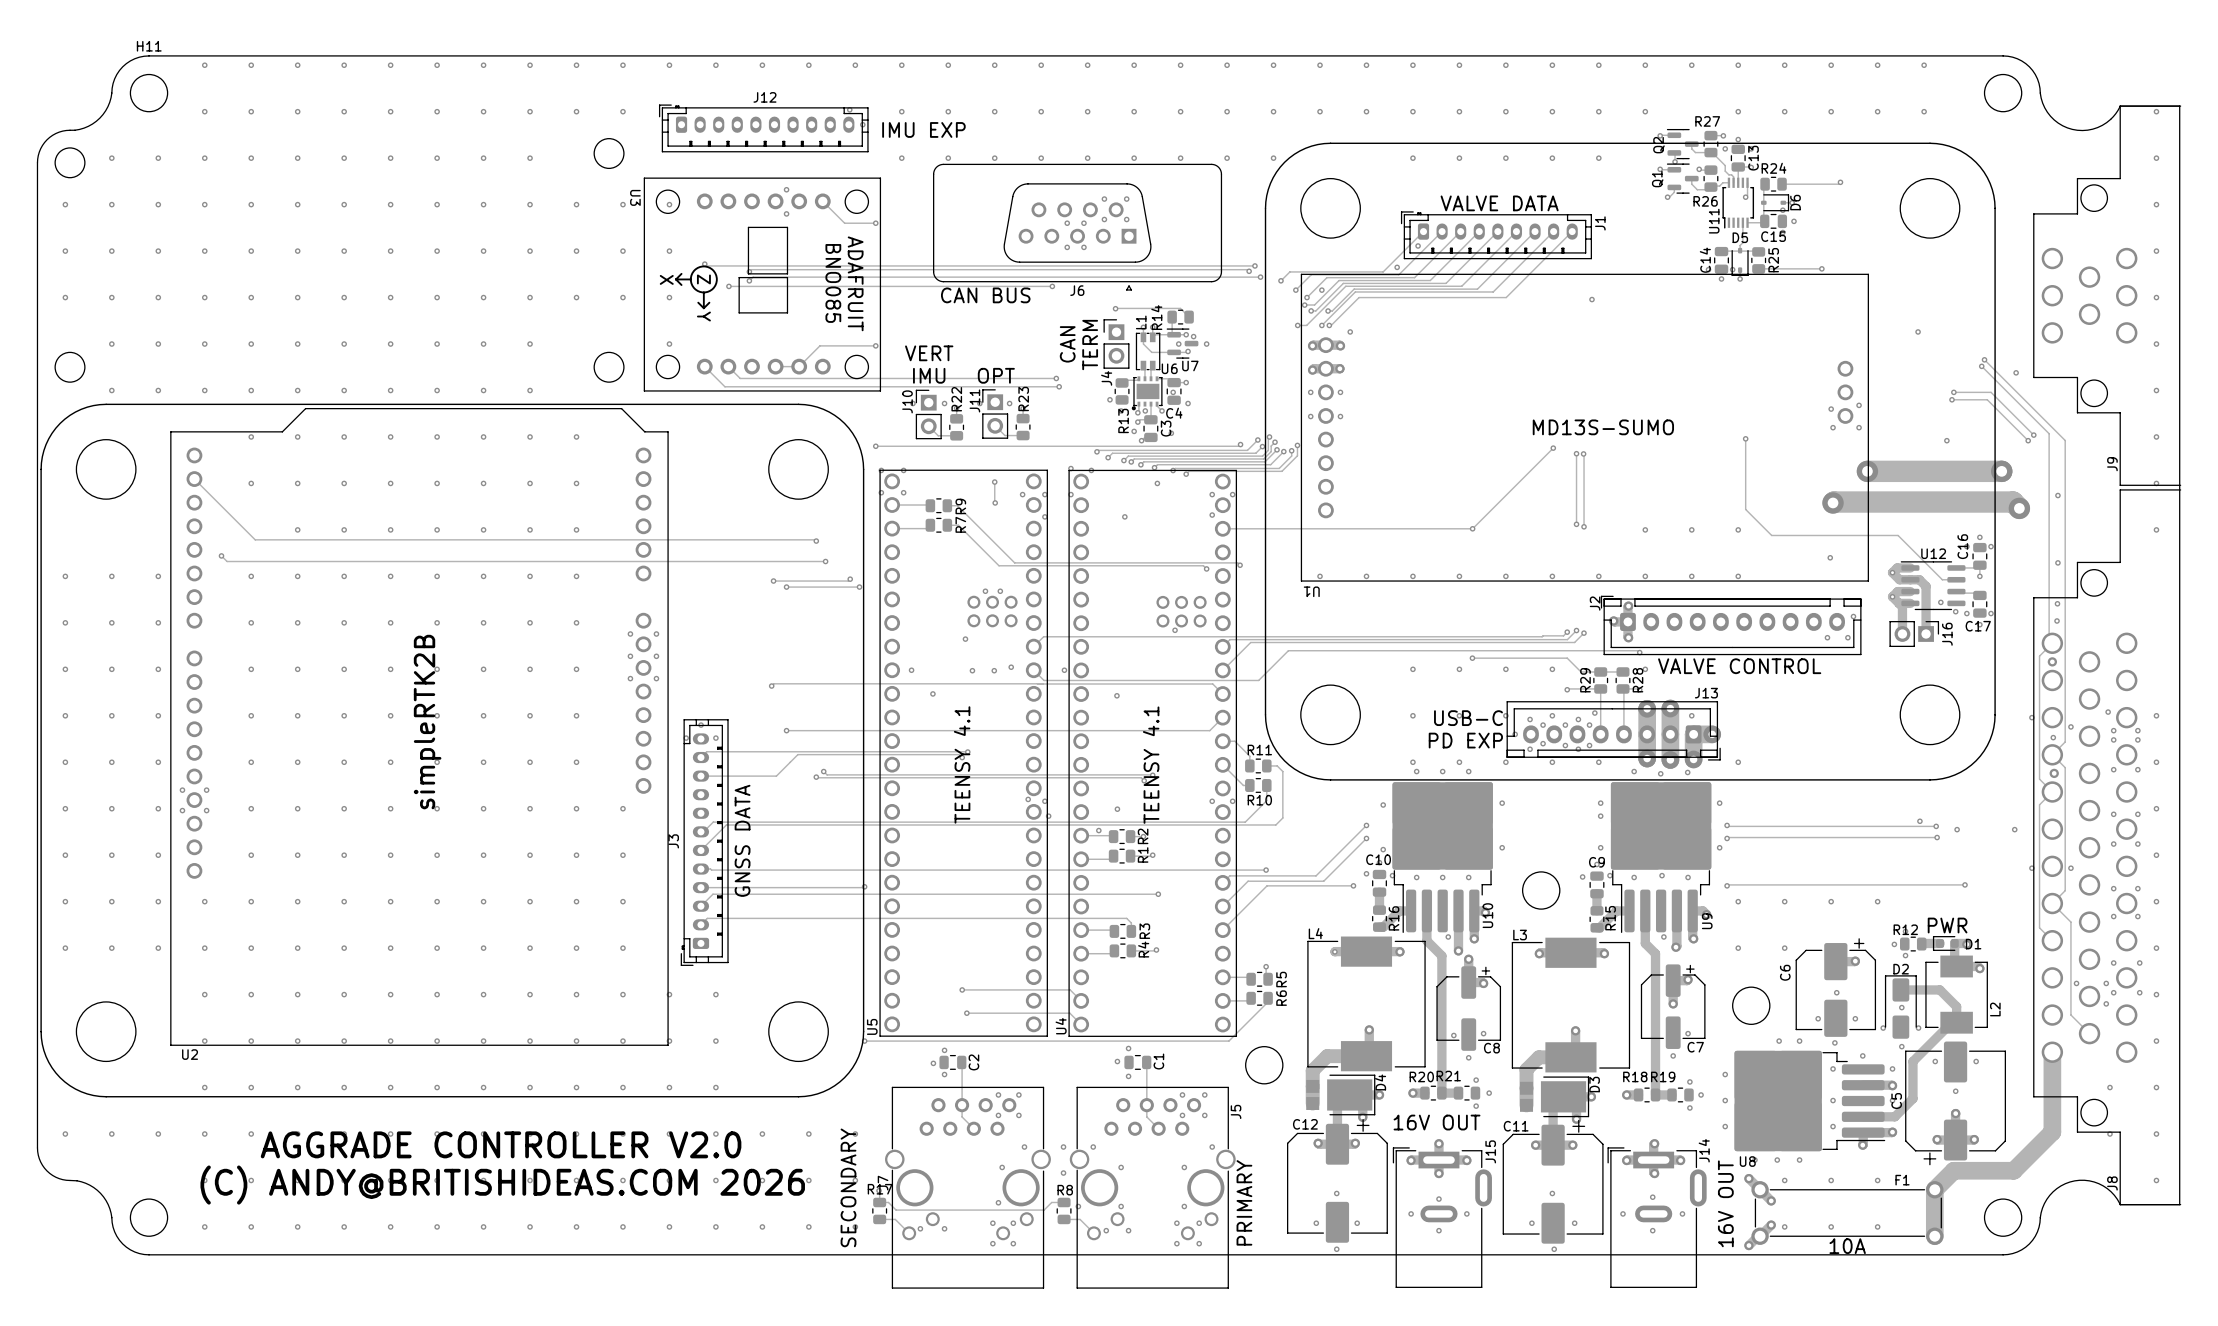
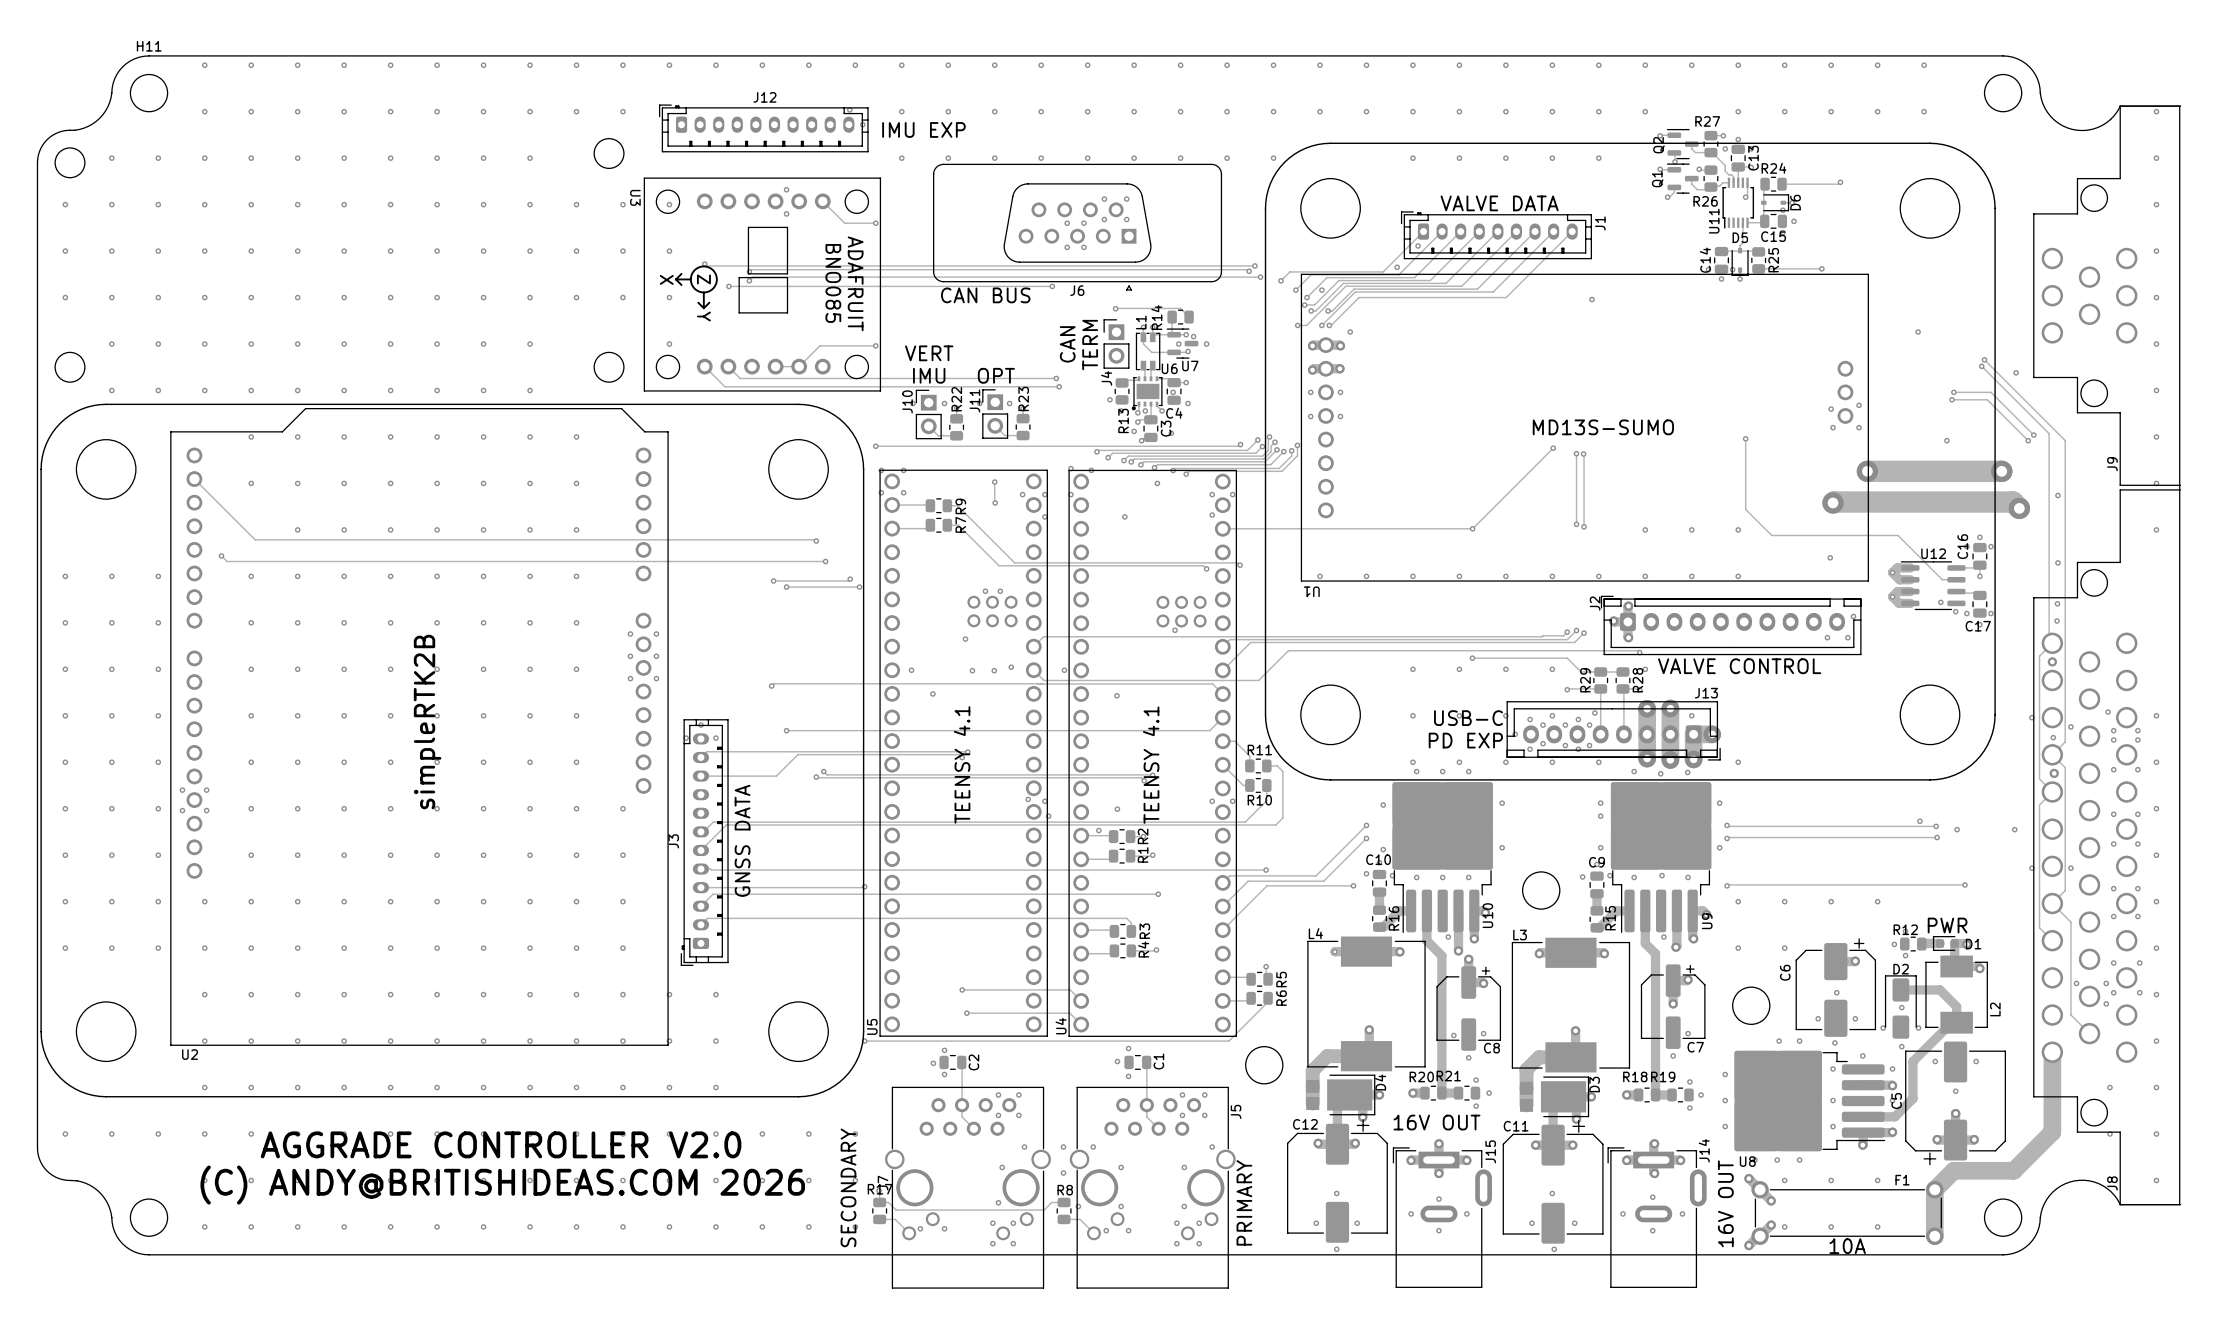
track: (1910, 579) (1919, 579) (1926, 586) (1926, 634) -> none
track: (1899, 603) (1902, 606) (1902, 634) -> none
J16: (1914, 634) -> none

